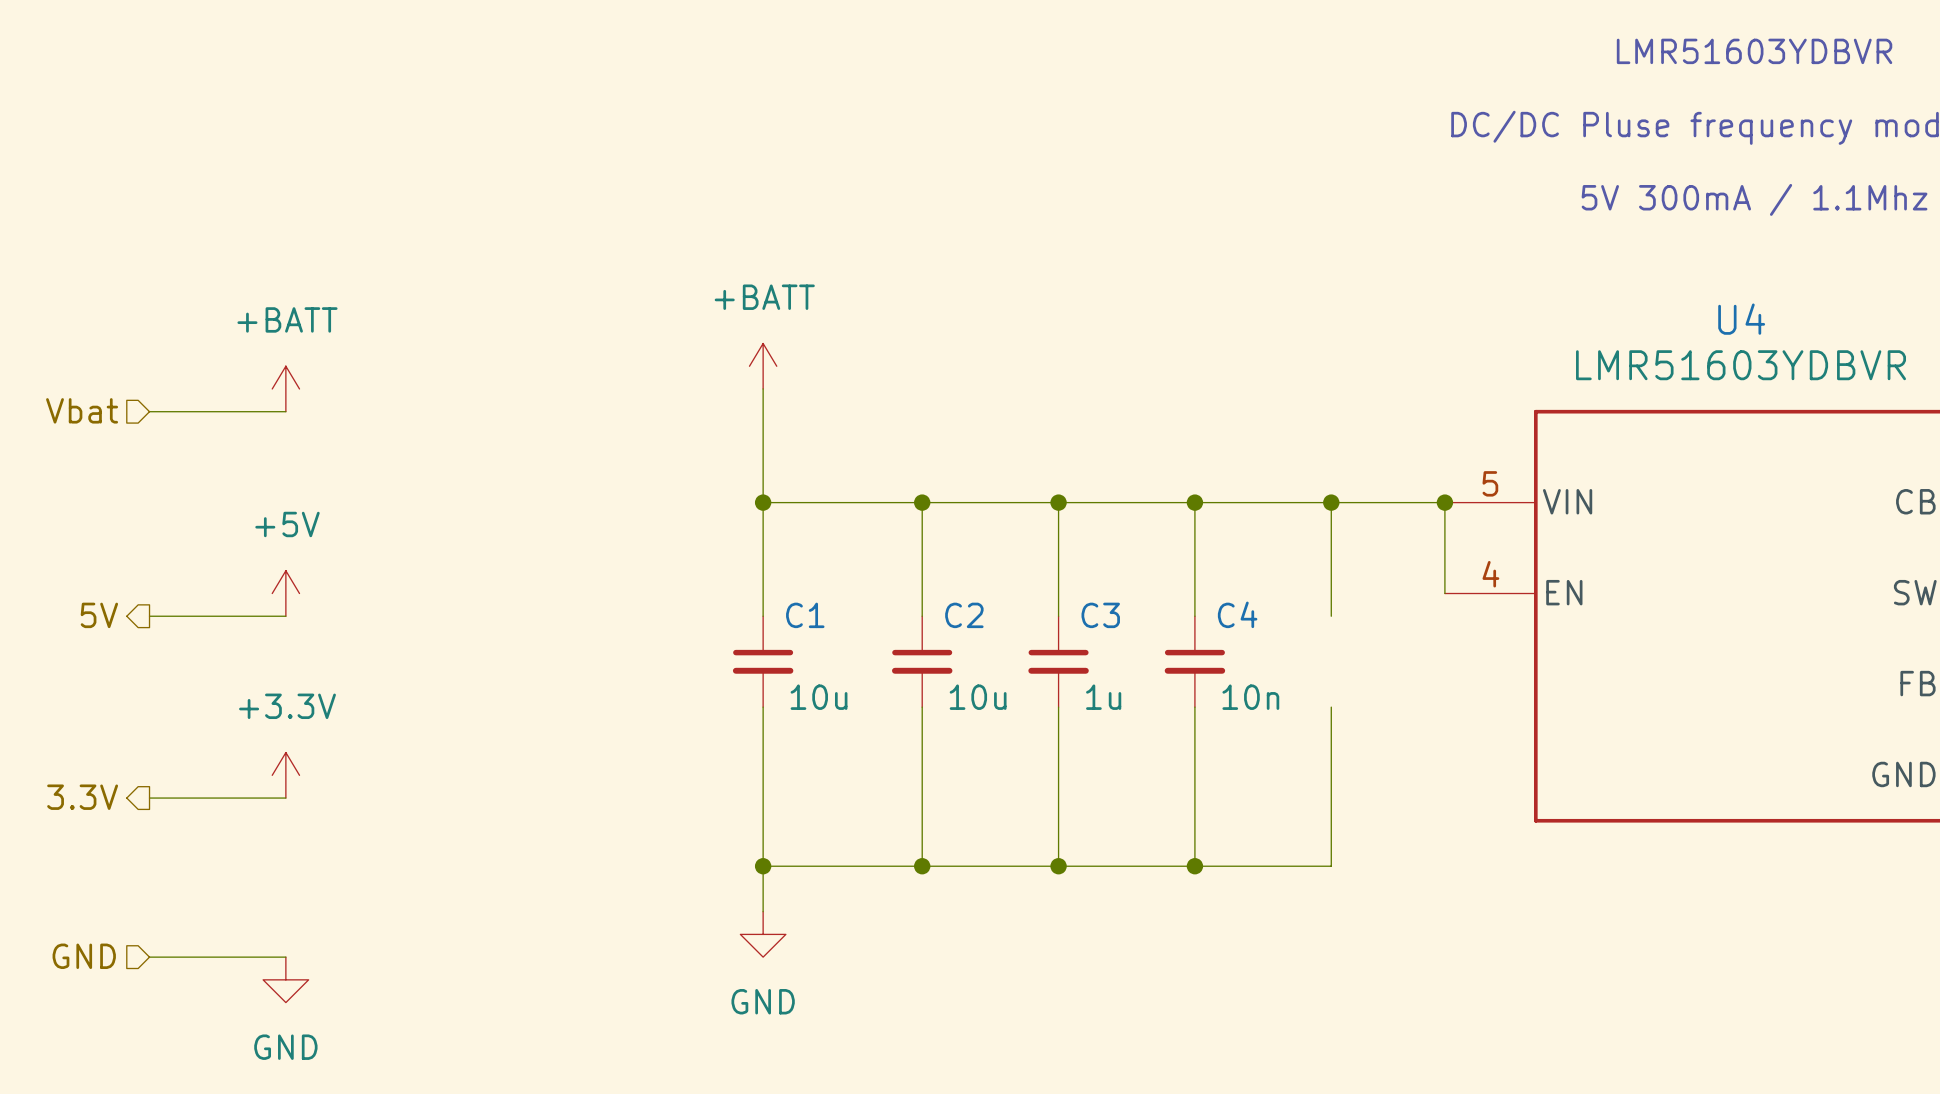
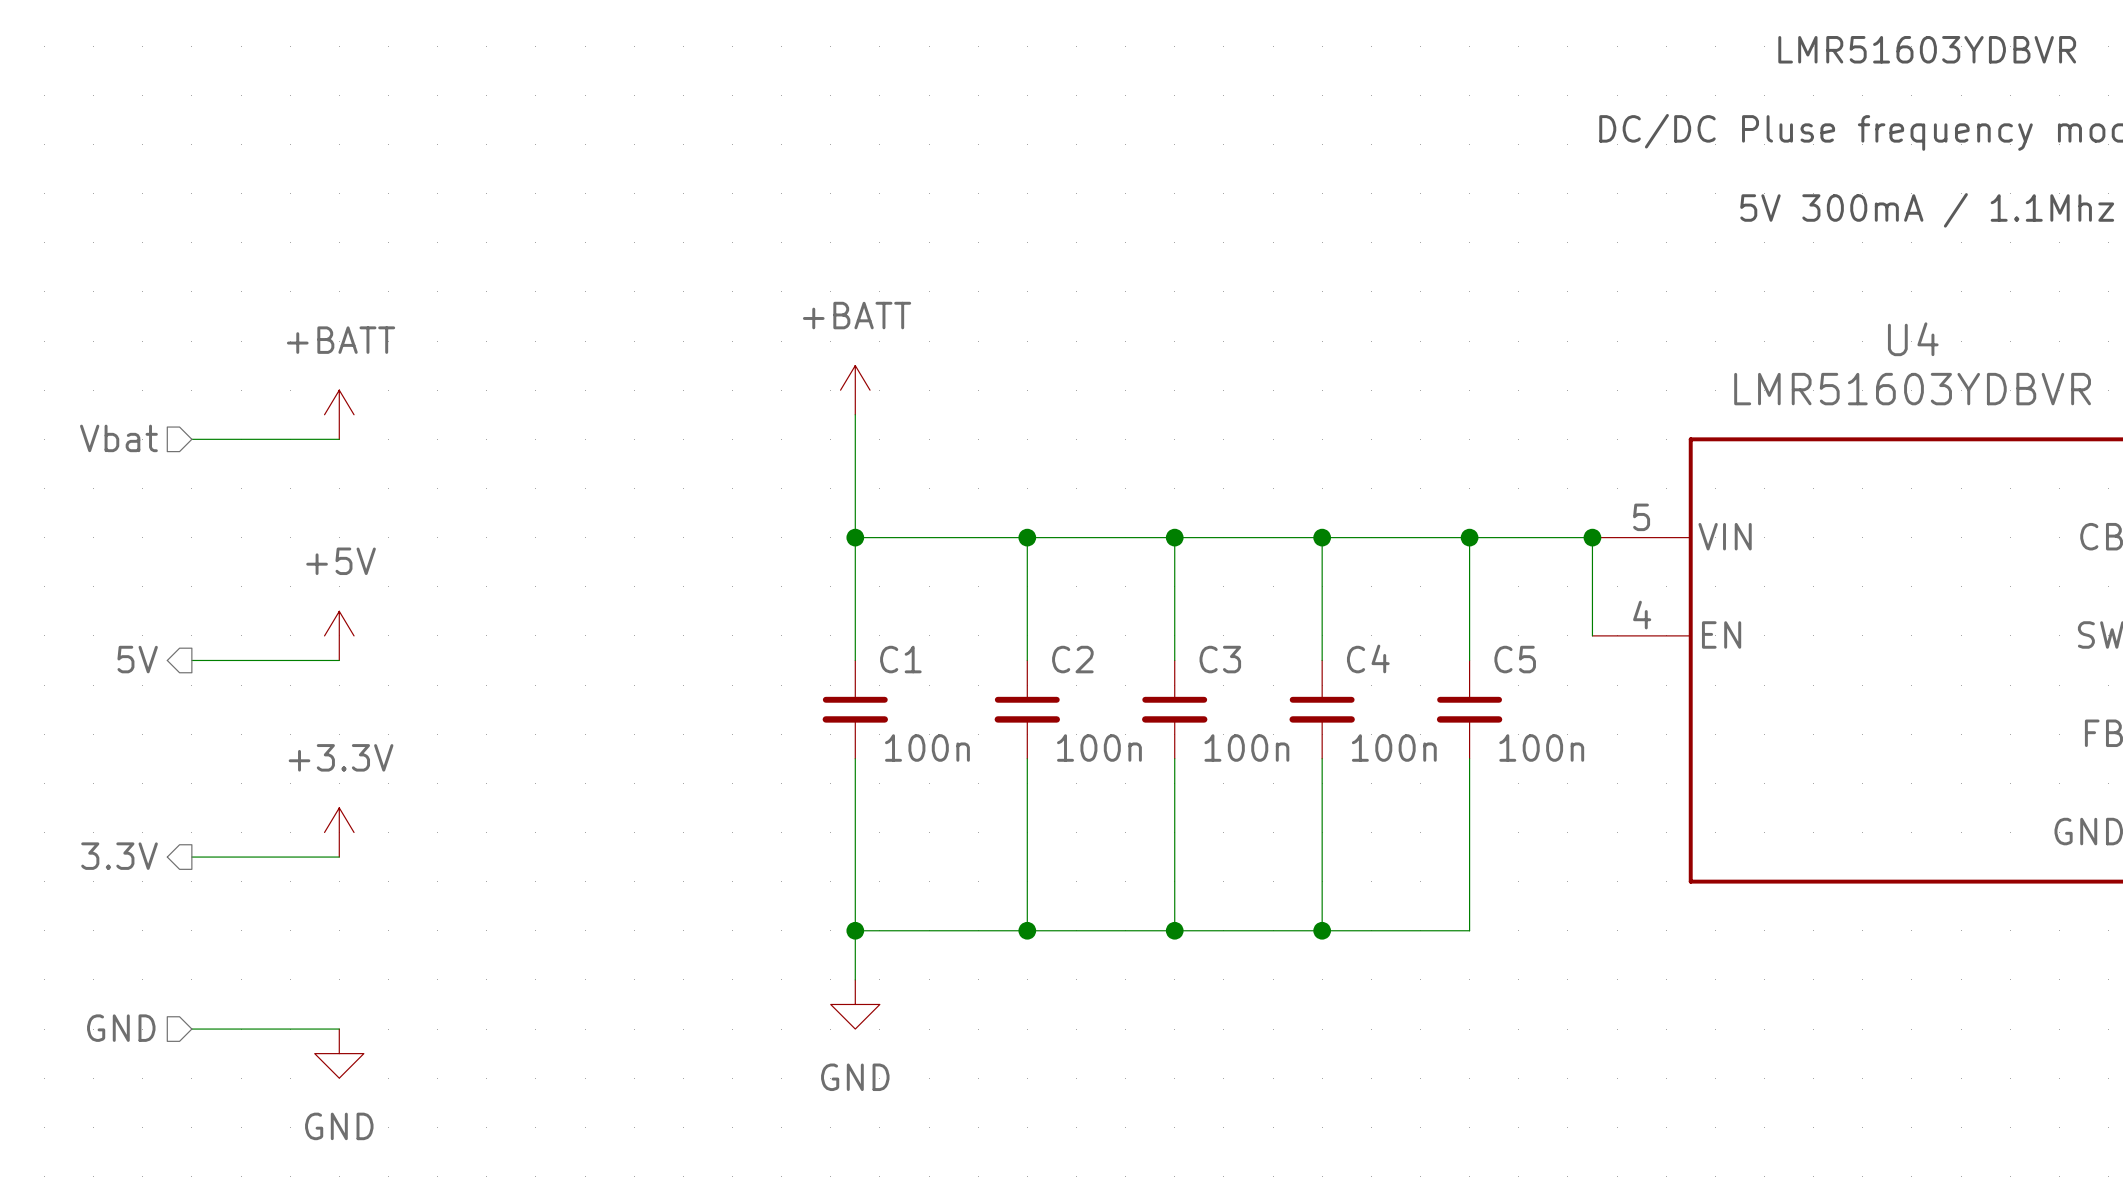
C5: none -> 100n (1469, 709)
C1 value: 10u (819, 697) -> 100n (927, 748)
C2 value: 10u (978, 697) -> 100n (1099, 748)
C3 value: 1u (1103, 697) -> 100n (1246, 748)
C4 value: 10n (1250, 697) -> 100n (1394, 748)

